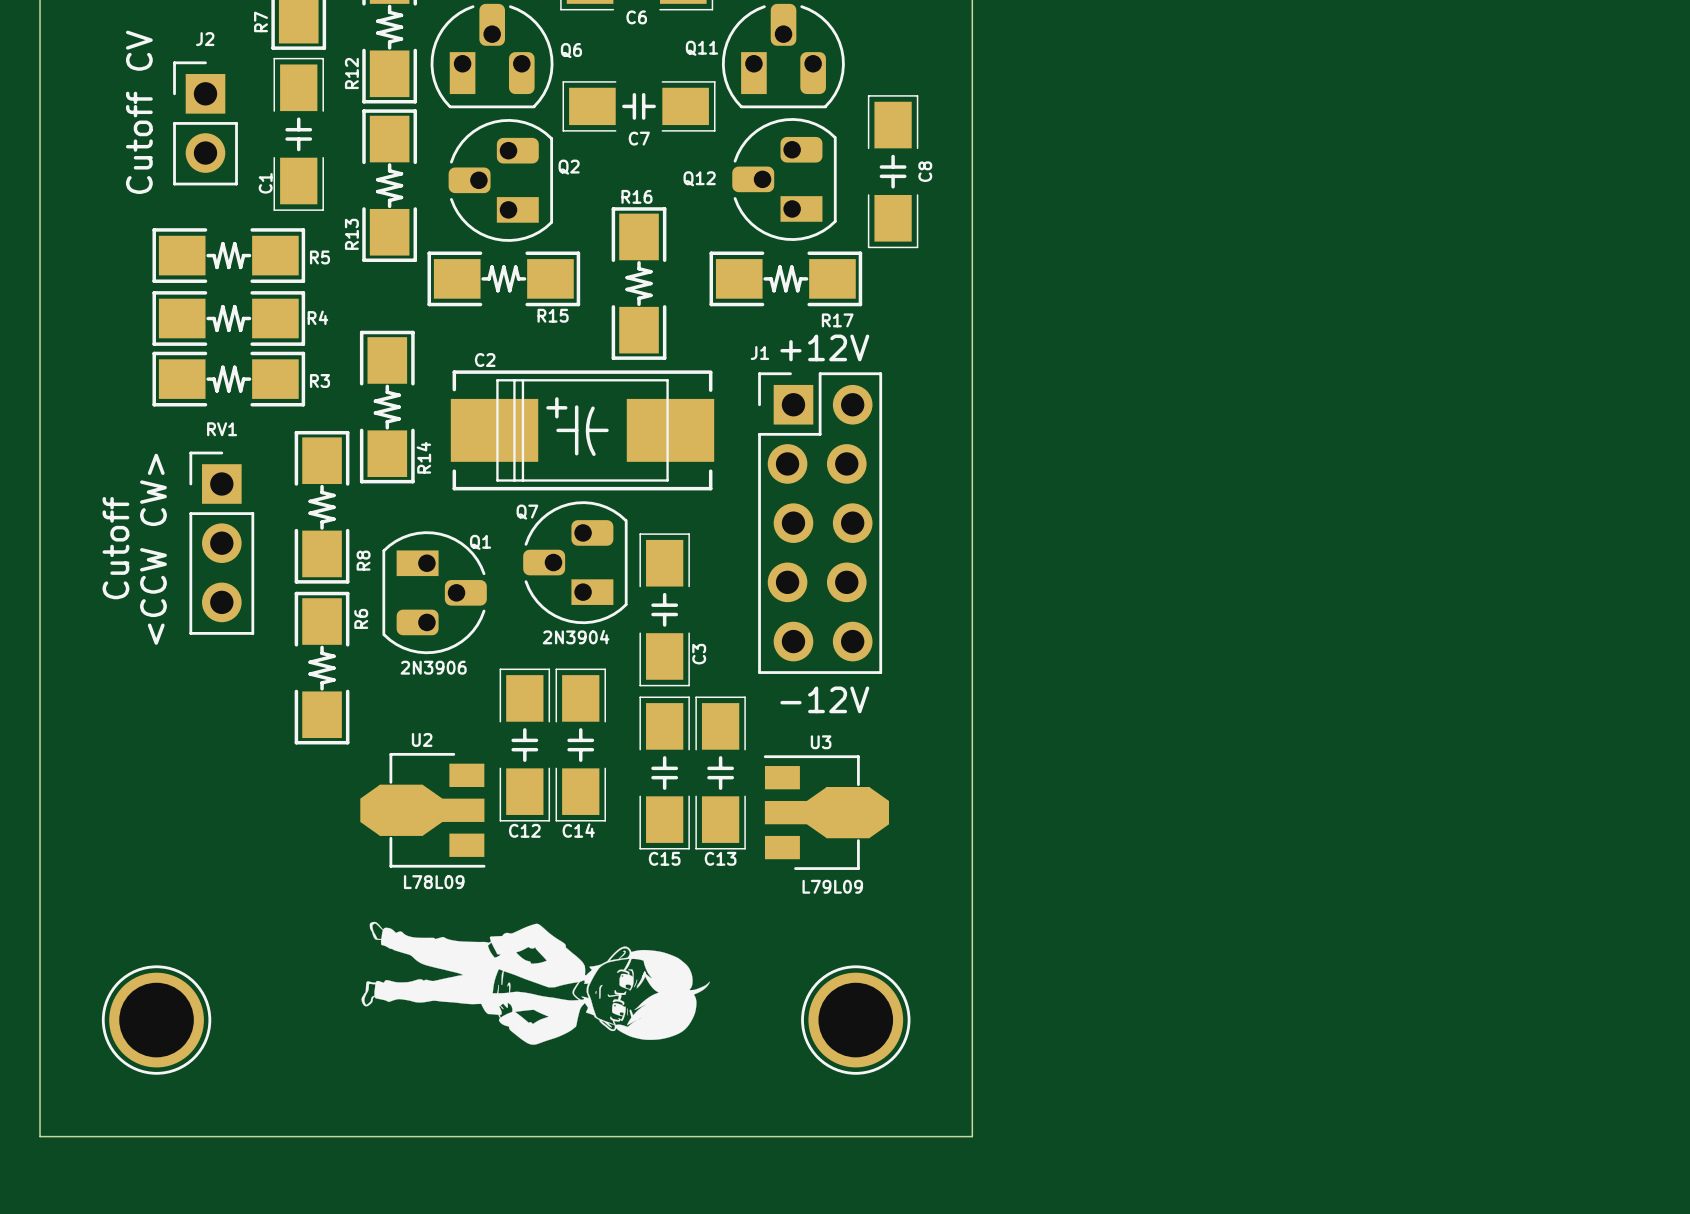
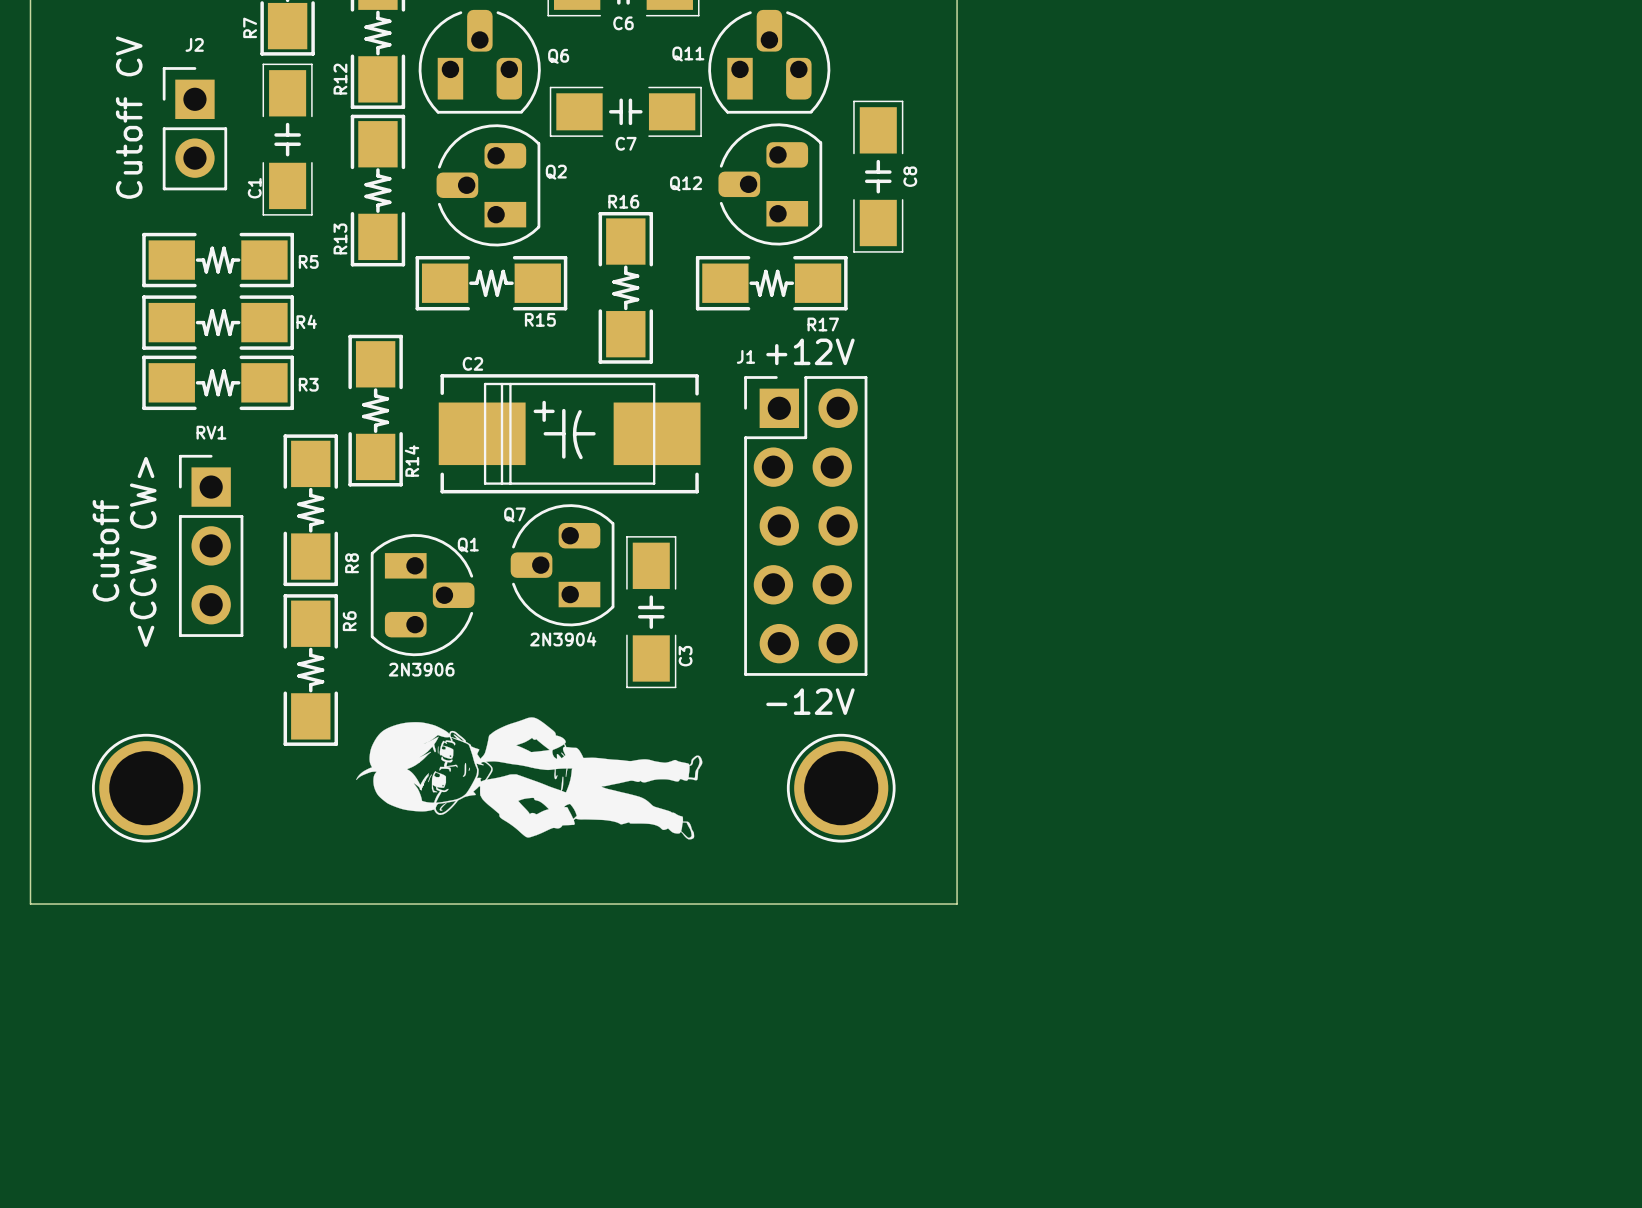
drawing: none -> [356, 717, 703, 840]
C12: (524, 745) -> none
C14: (580, 745) -> none
C15: (664, 773) -> none
C13: (720, 773) -> none
U2: L78L09 (422, 810) -> none
U3: L79L09 (826, 812) -> none
board edge: (40, 903) (40, 1136) (972, 1136) (972, 903) -> (30, 904) (957, 904)
drawing: [361, 921, 710, 1045] -> none
part position: (156, 1020) -> (146, 788)
part position: (855, 1020) -> (841, 788)

